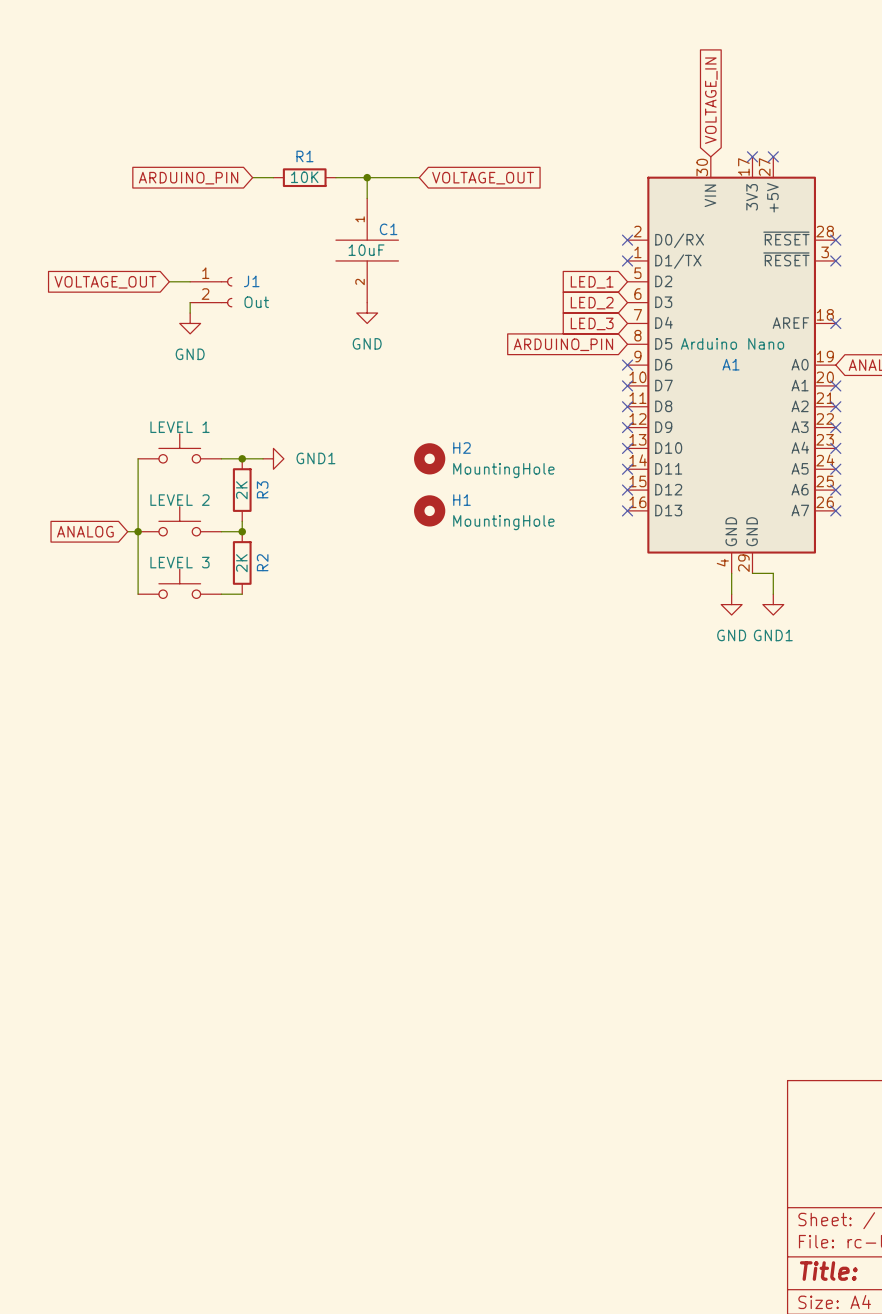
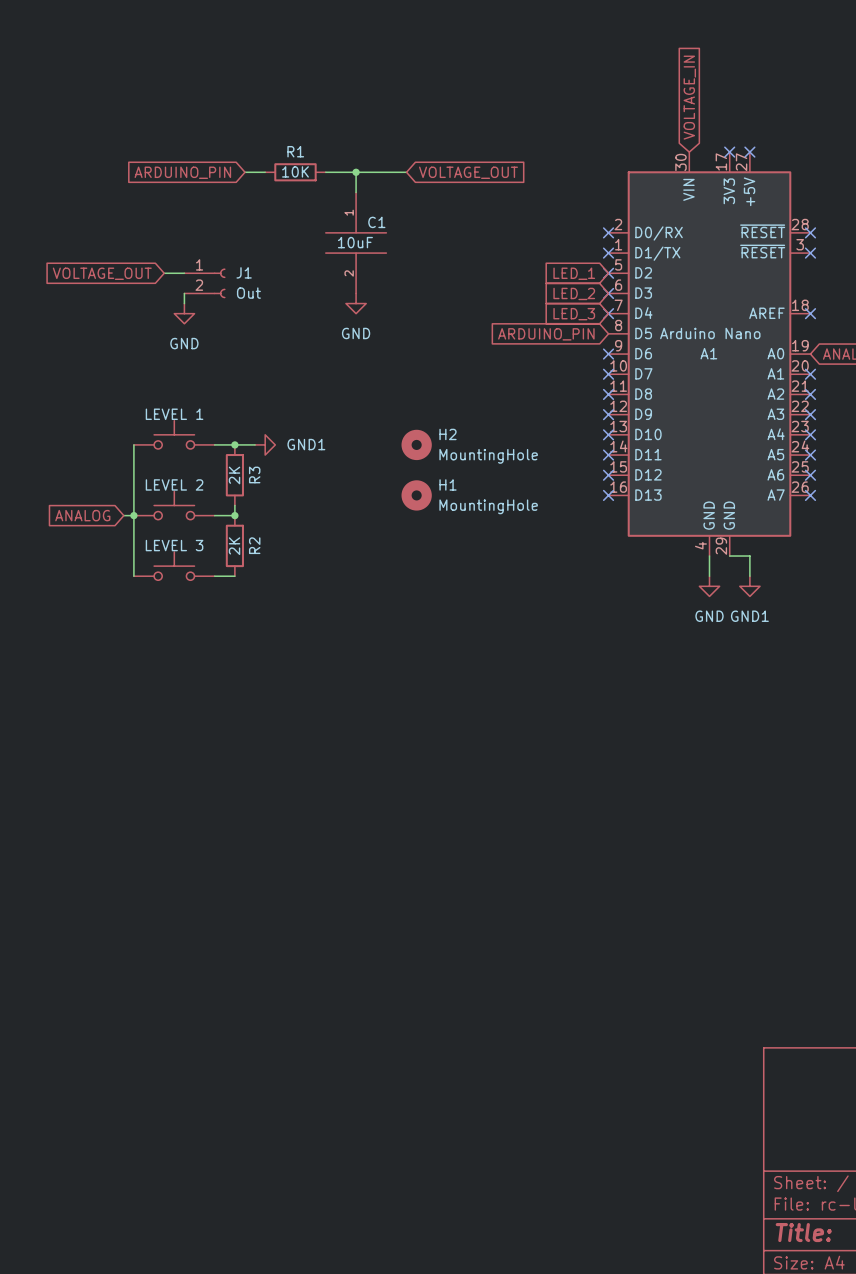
no-connect mark: none -> (608, 273)
no-connect mark: none -> (608, 293)
no-connect mark: none -> (608, 313)

